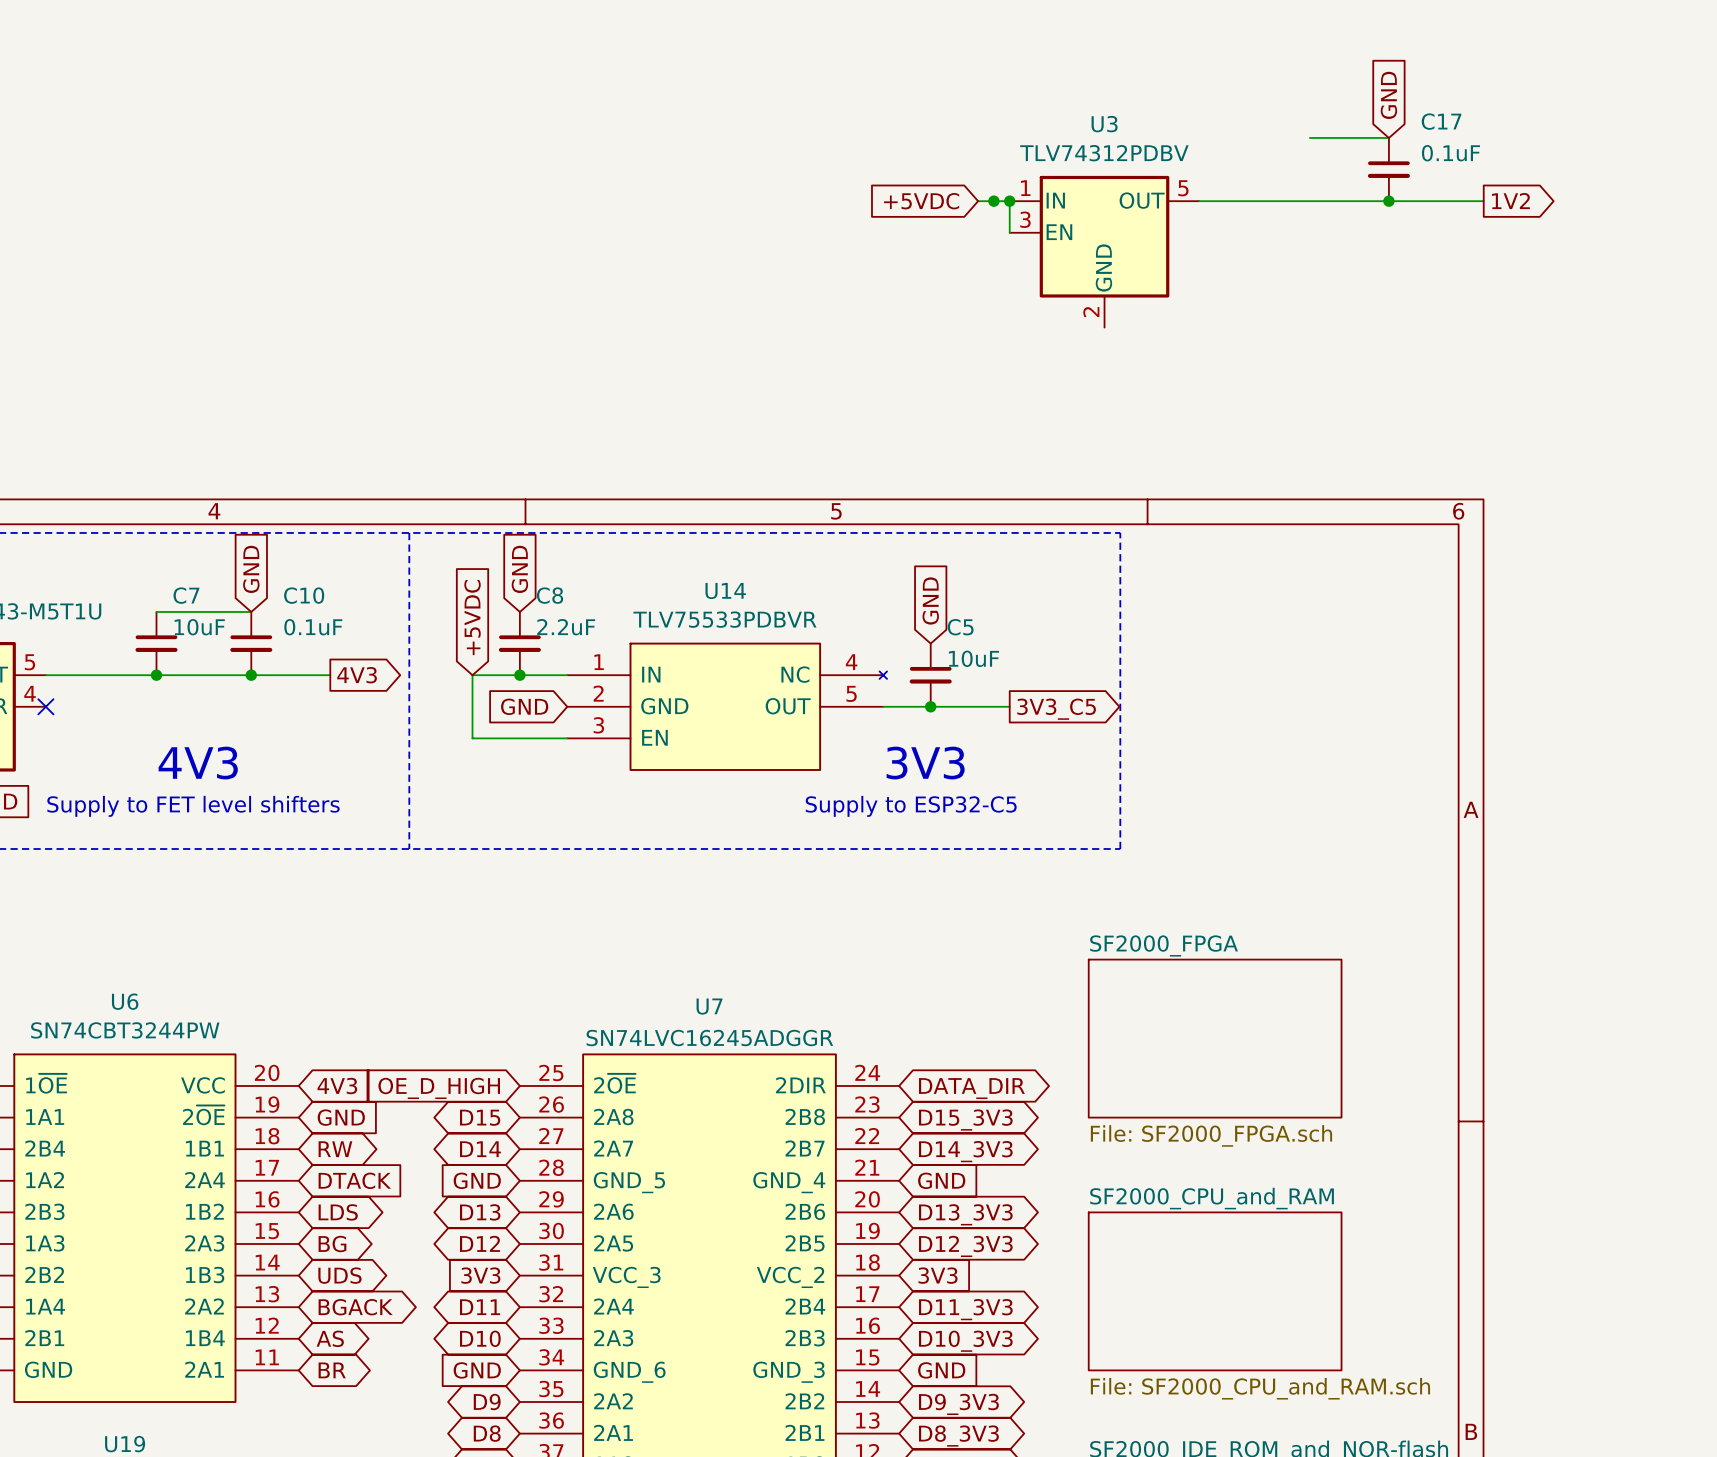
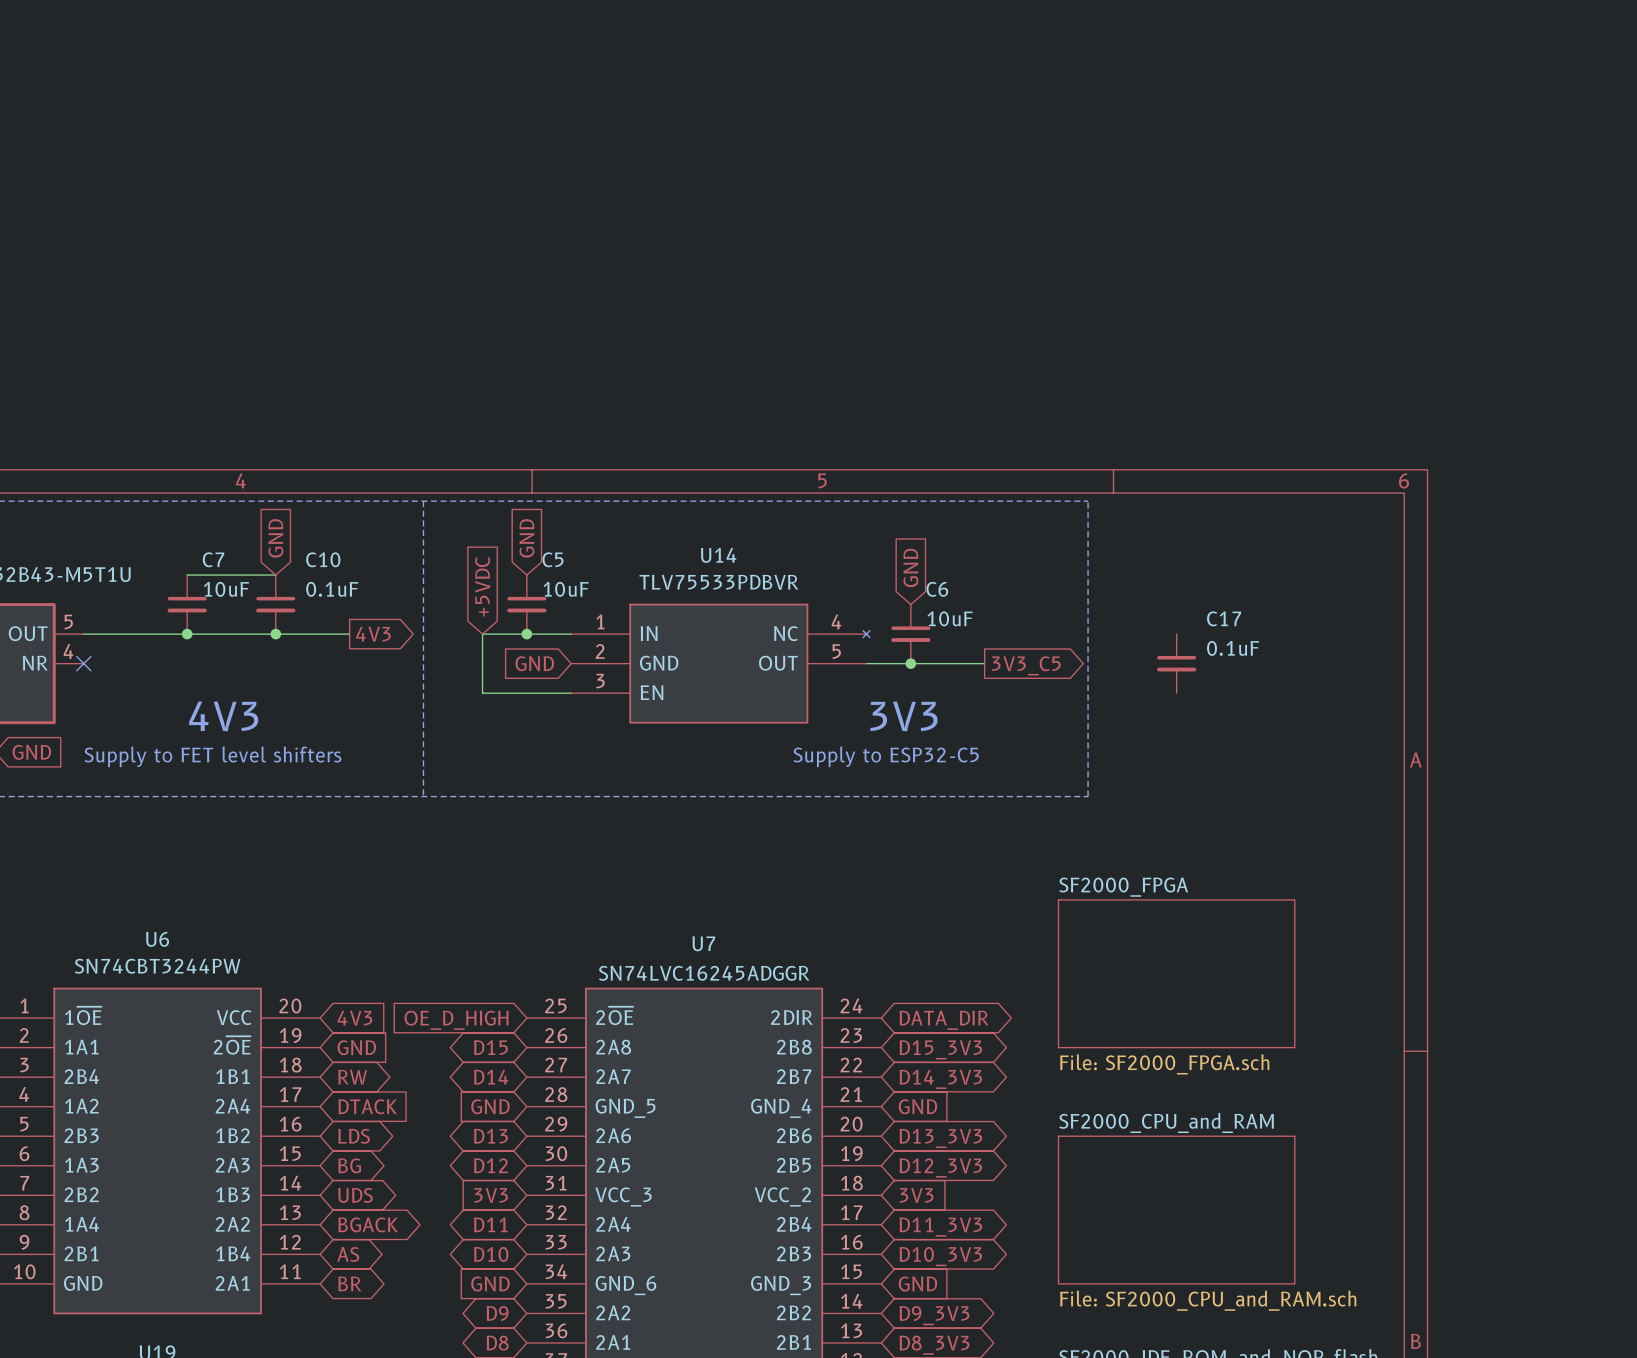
global label: GND (1388, 95) -> none
wire: (1309, 137) (1388, 137) -> none
C17 position: (1388, 169) -> (1176, 663)
global label: +5VDC (921, 201) -> none
wire: (978, 201) (1009, 201) (1009, 232) -> none
junction: (993, 201) -> none
junction: (1009, 201) -> none
wire: (1199, 201) (1483, 201) -> none
junction: (1388, 201) -> none
global label: 1V2 (1510, 201) -> none
U3: TLV74312PDBV (1104, 251) -> none
C8 name: C8 (550, 595) -> C5 (552, 559)
C8 value: 2.2uF (566, 627) -> 10uF (566, 589)
C5 name: C5 (960, 627) -> C6 (937, 589)

